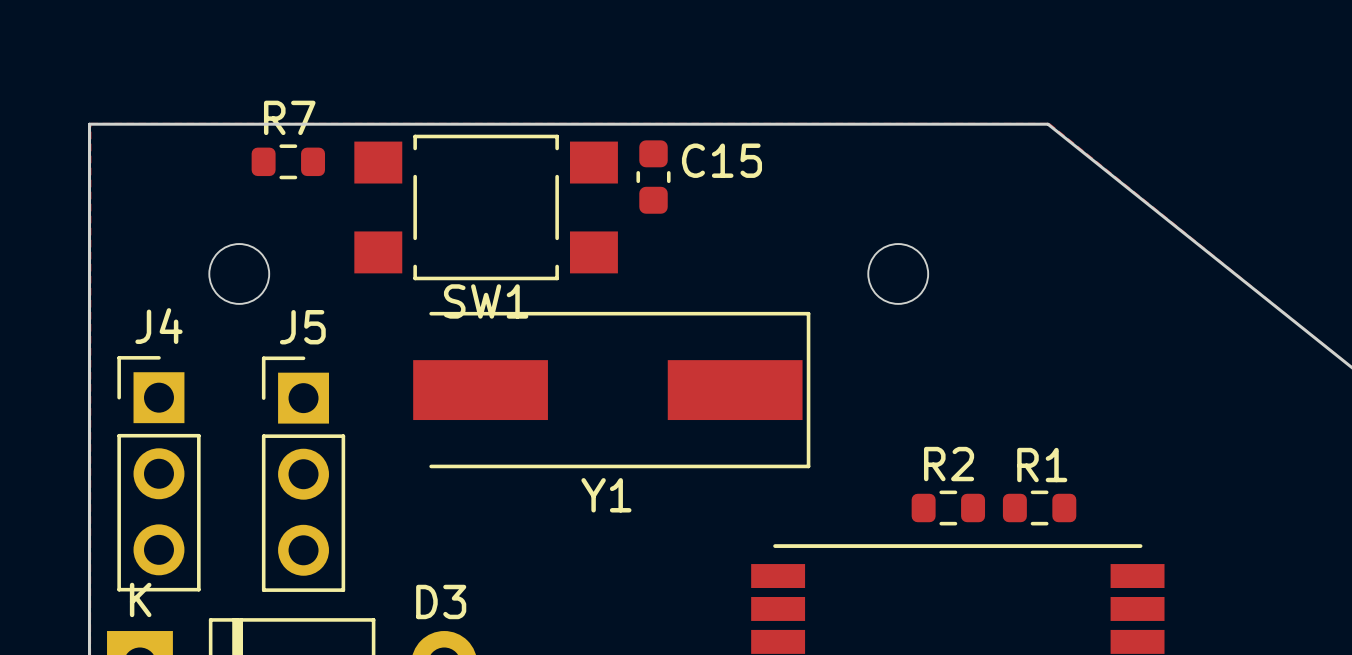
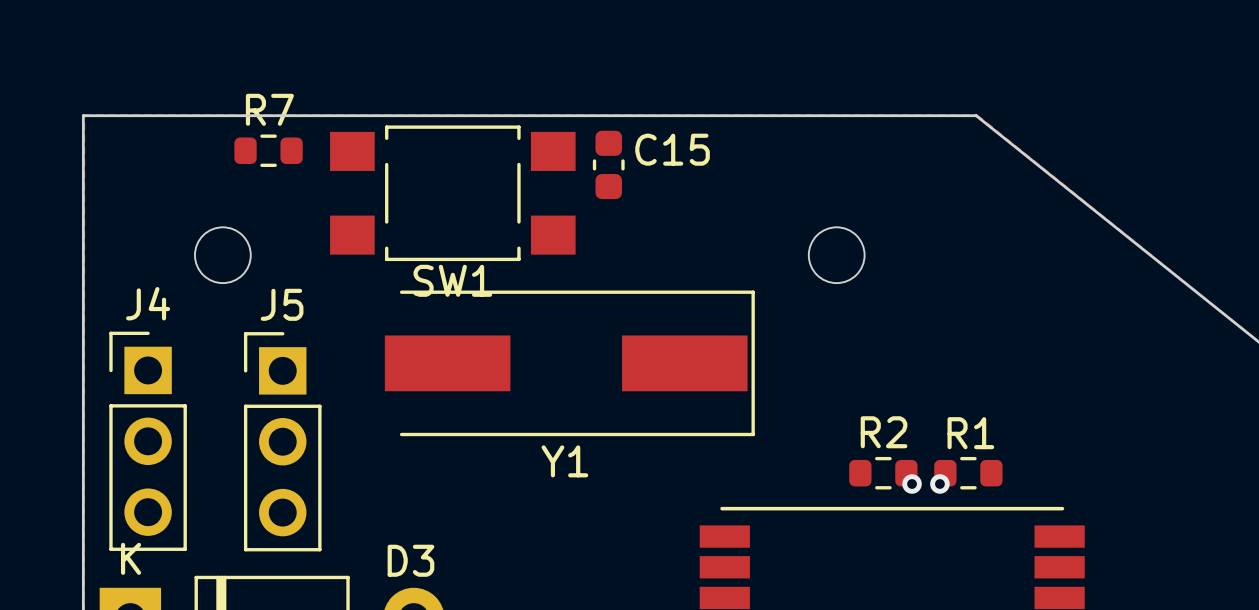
via: none -> (912, 484)
via: none -> (939, 484)

